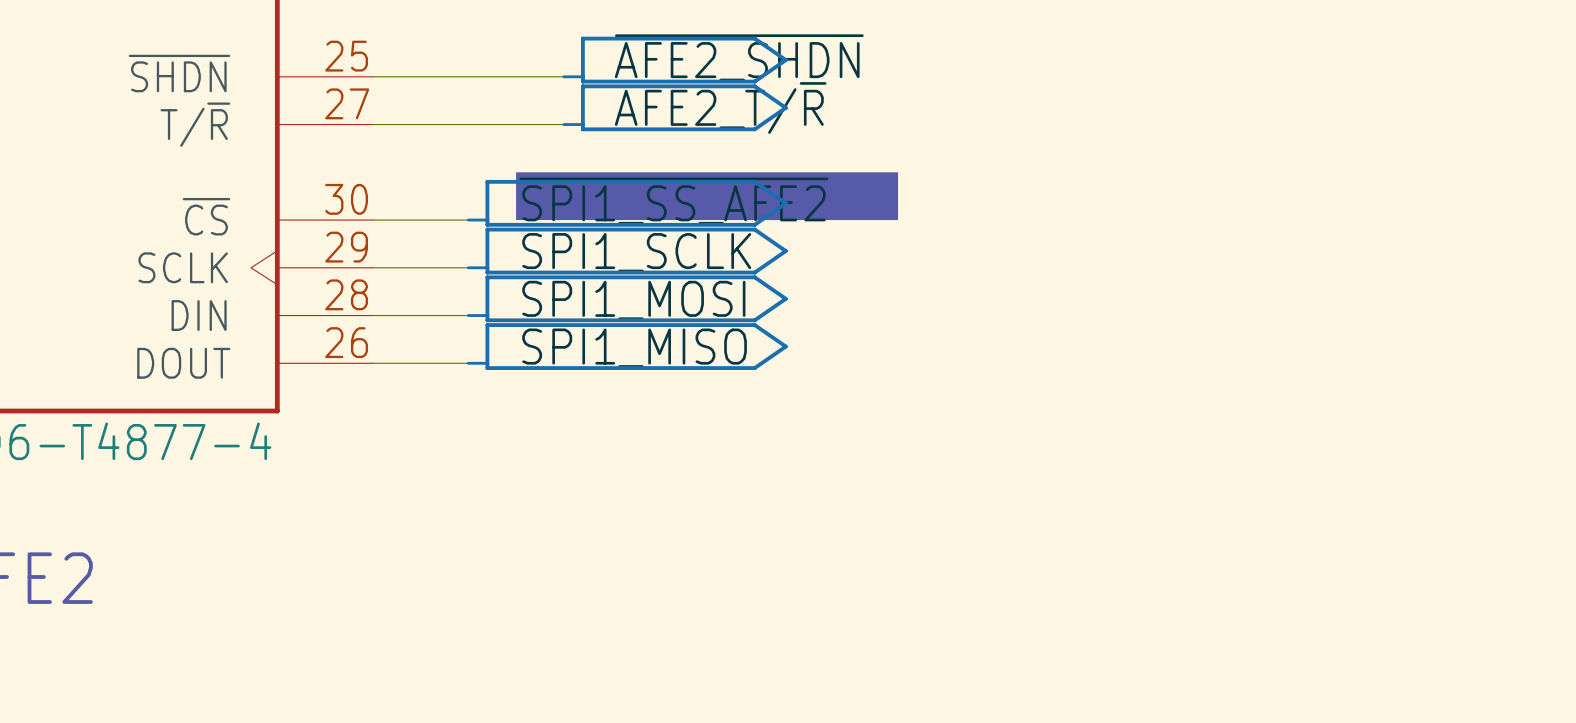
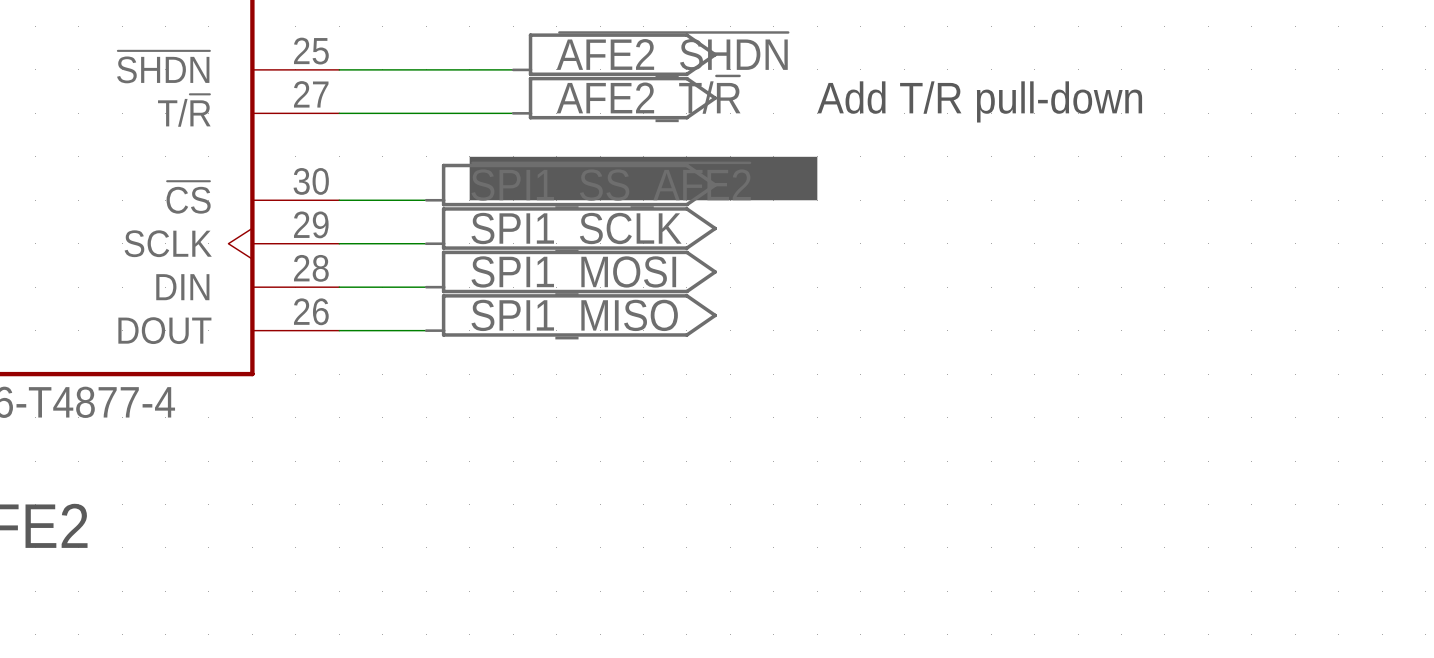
text: none -> Add T/R pull-down (979, 101)

